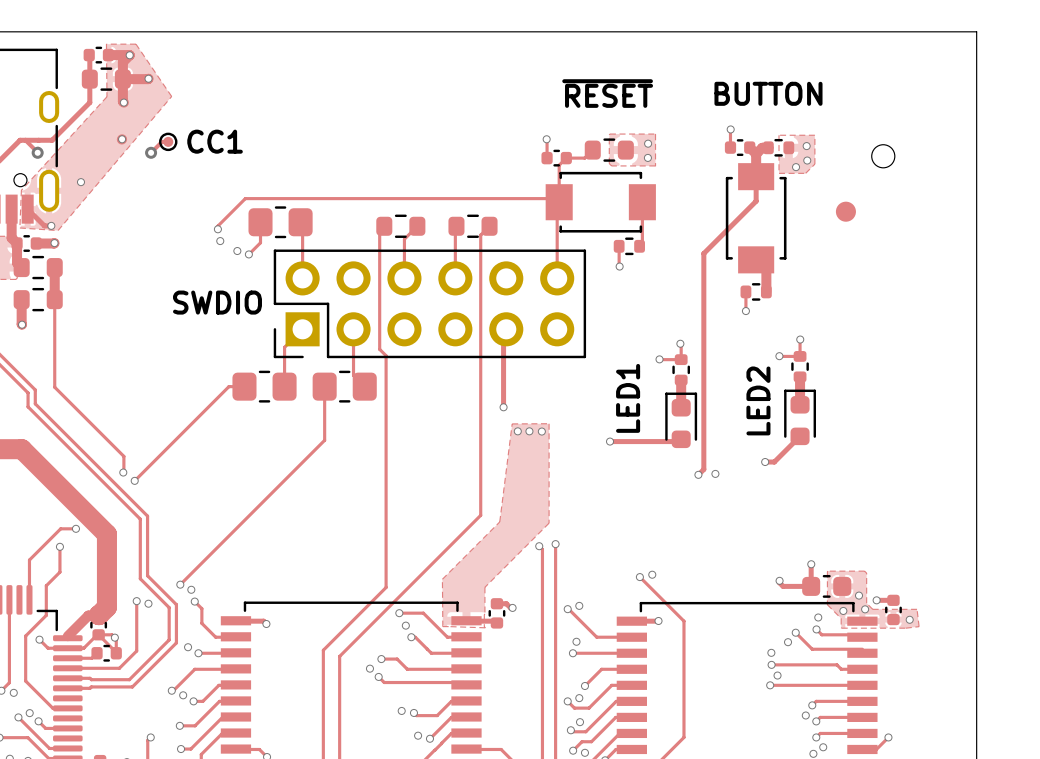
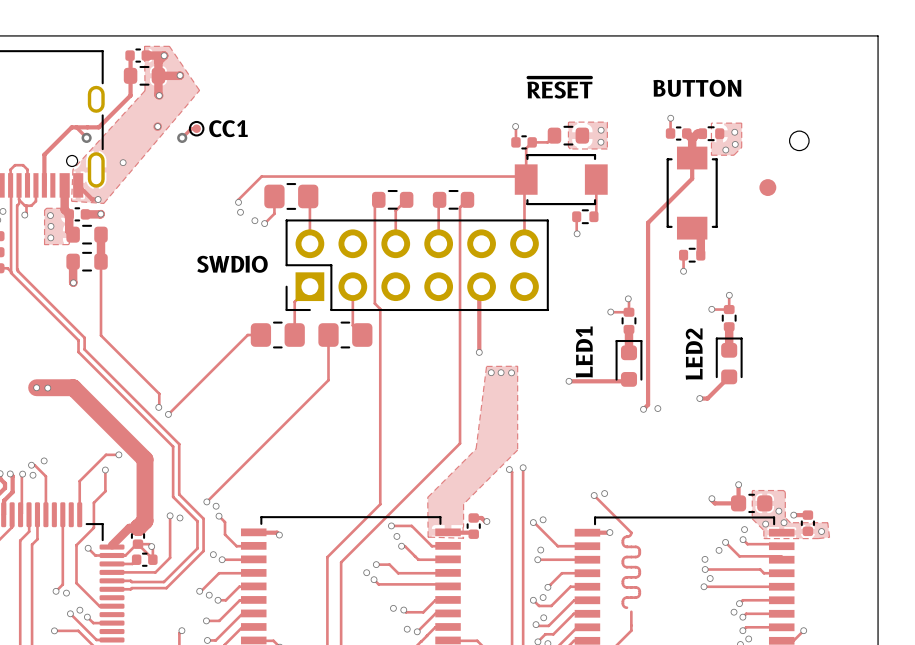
track: (683, 621) (683, 714) -> (631, 532) (627, 536)
track: none -> (626, 536) (623, 539) (624, 545) (637, 547) (639, 550) (637, 556) (626, 557) (623, 560) (624, 566) (636, 567) (639, 570) (637, 576) (626, 577) (623, 580) (624, 586) (636, 587) (639, 591) (637, 597) (623, 599) (623, 604) (626, 607)

